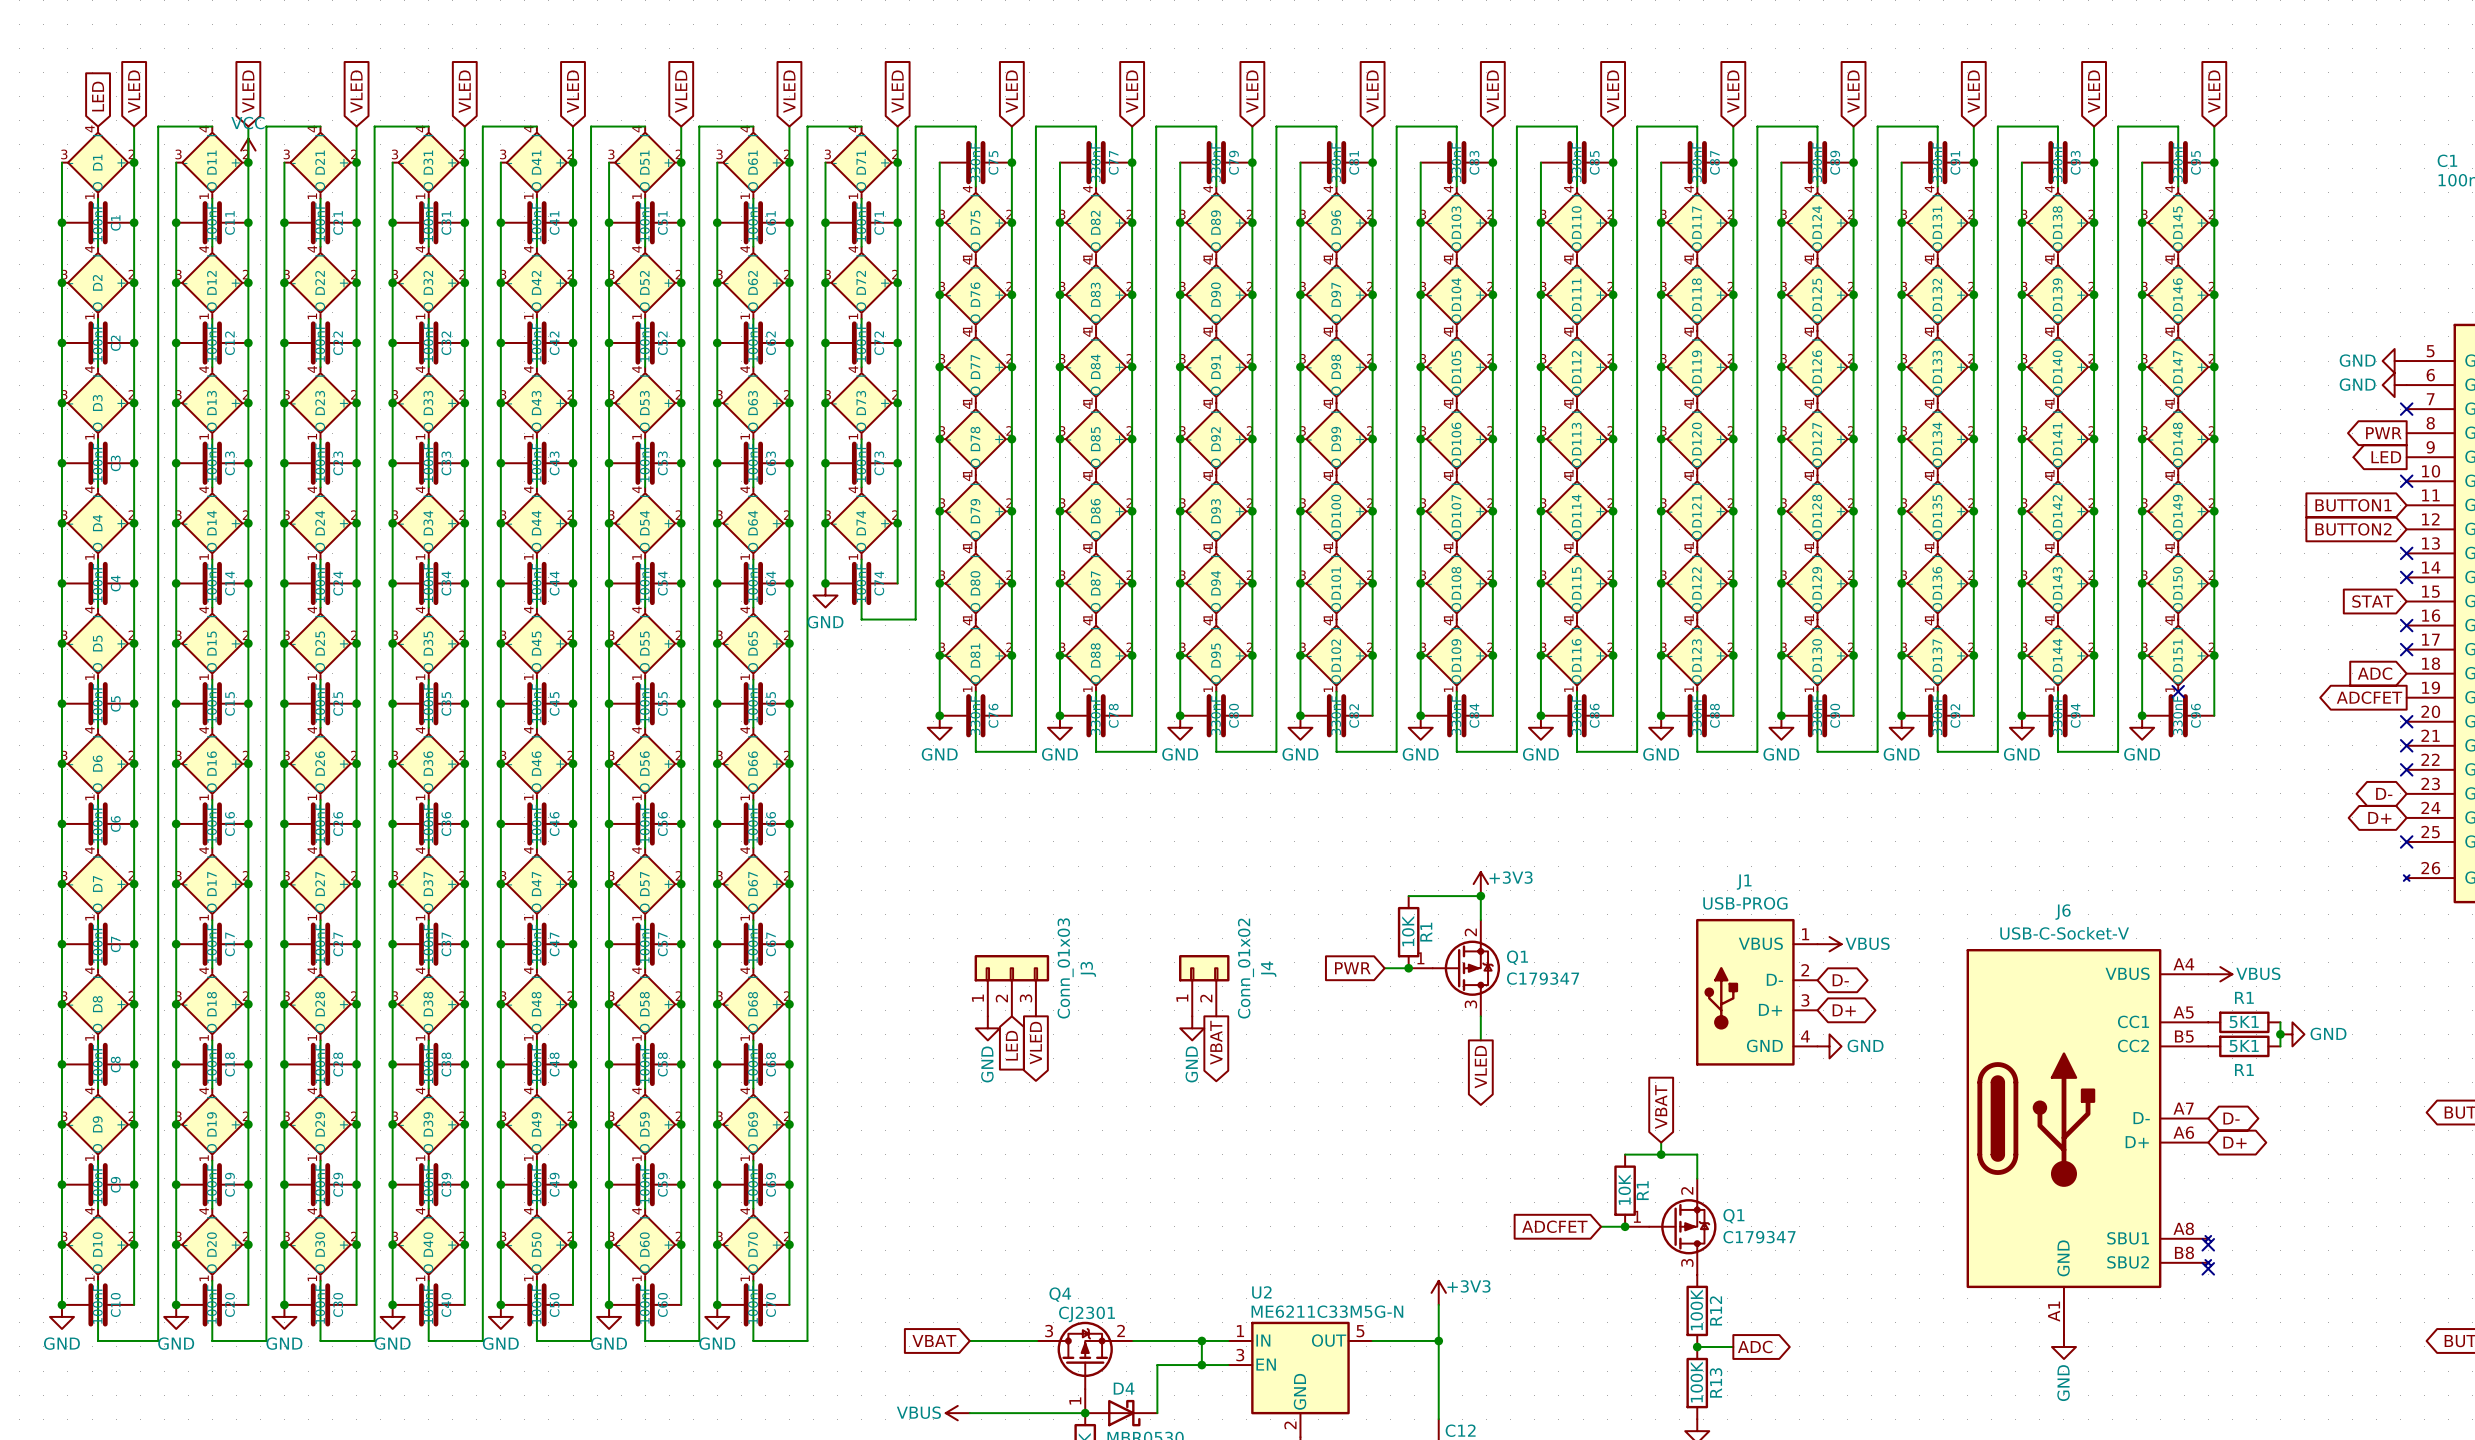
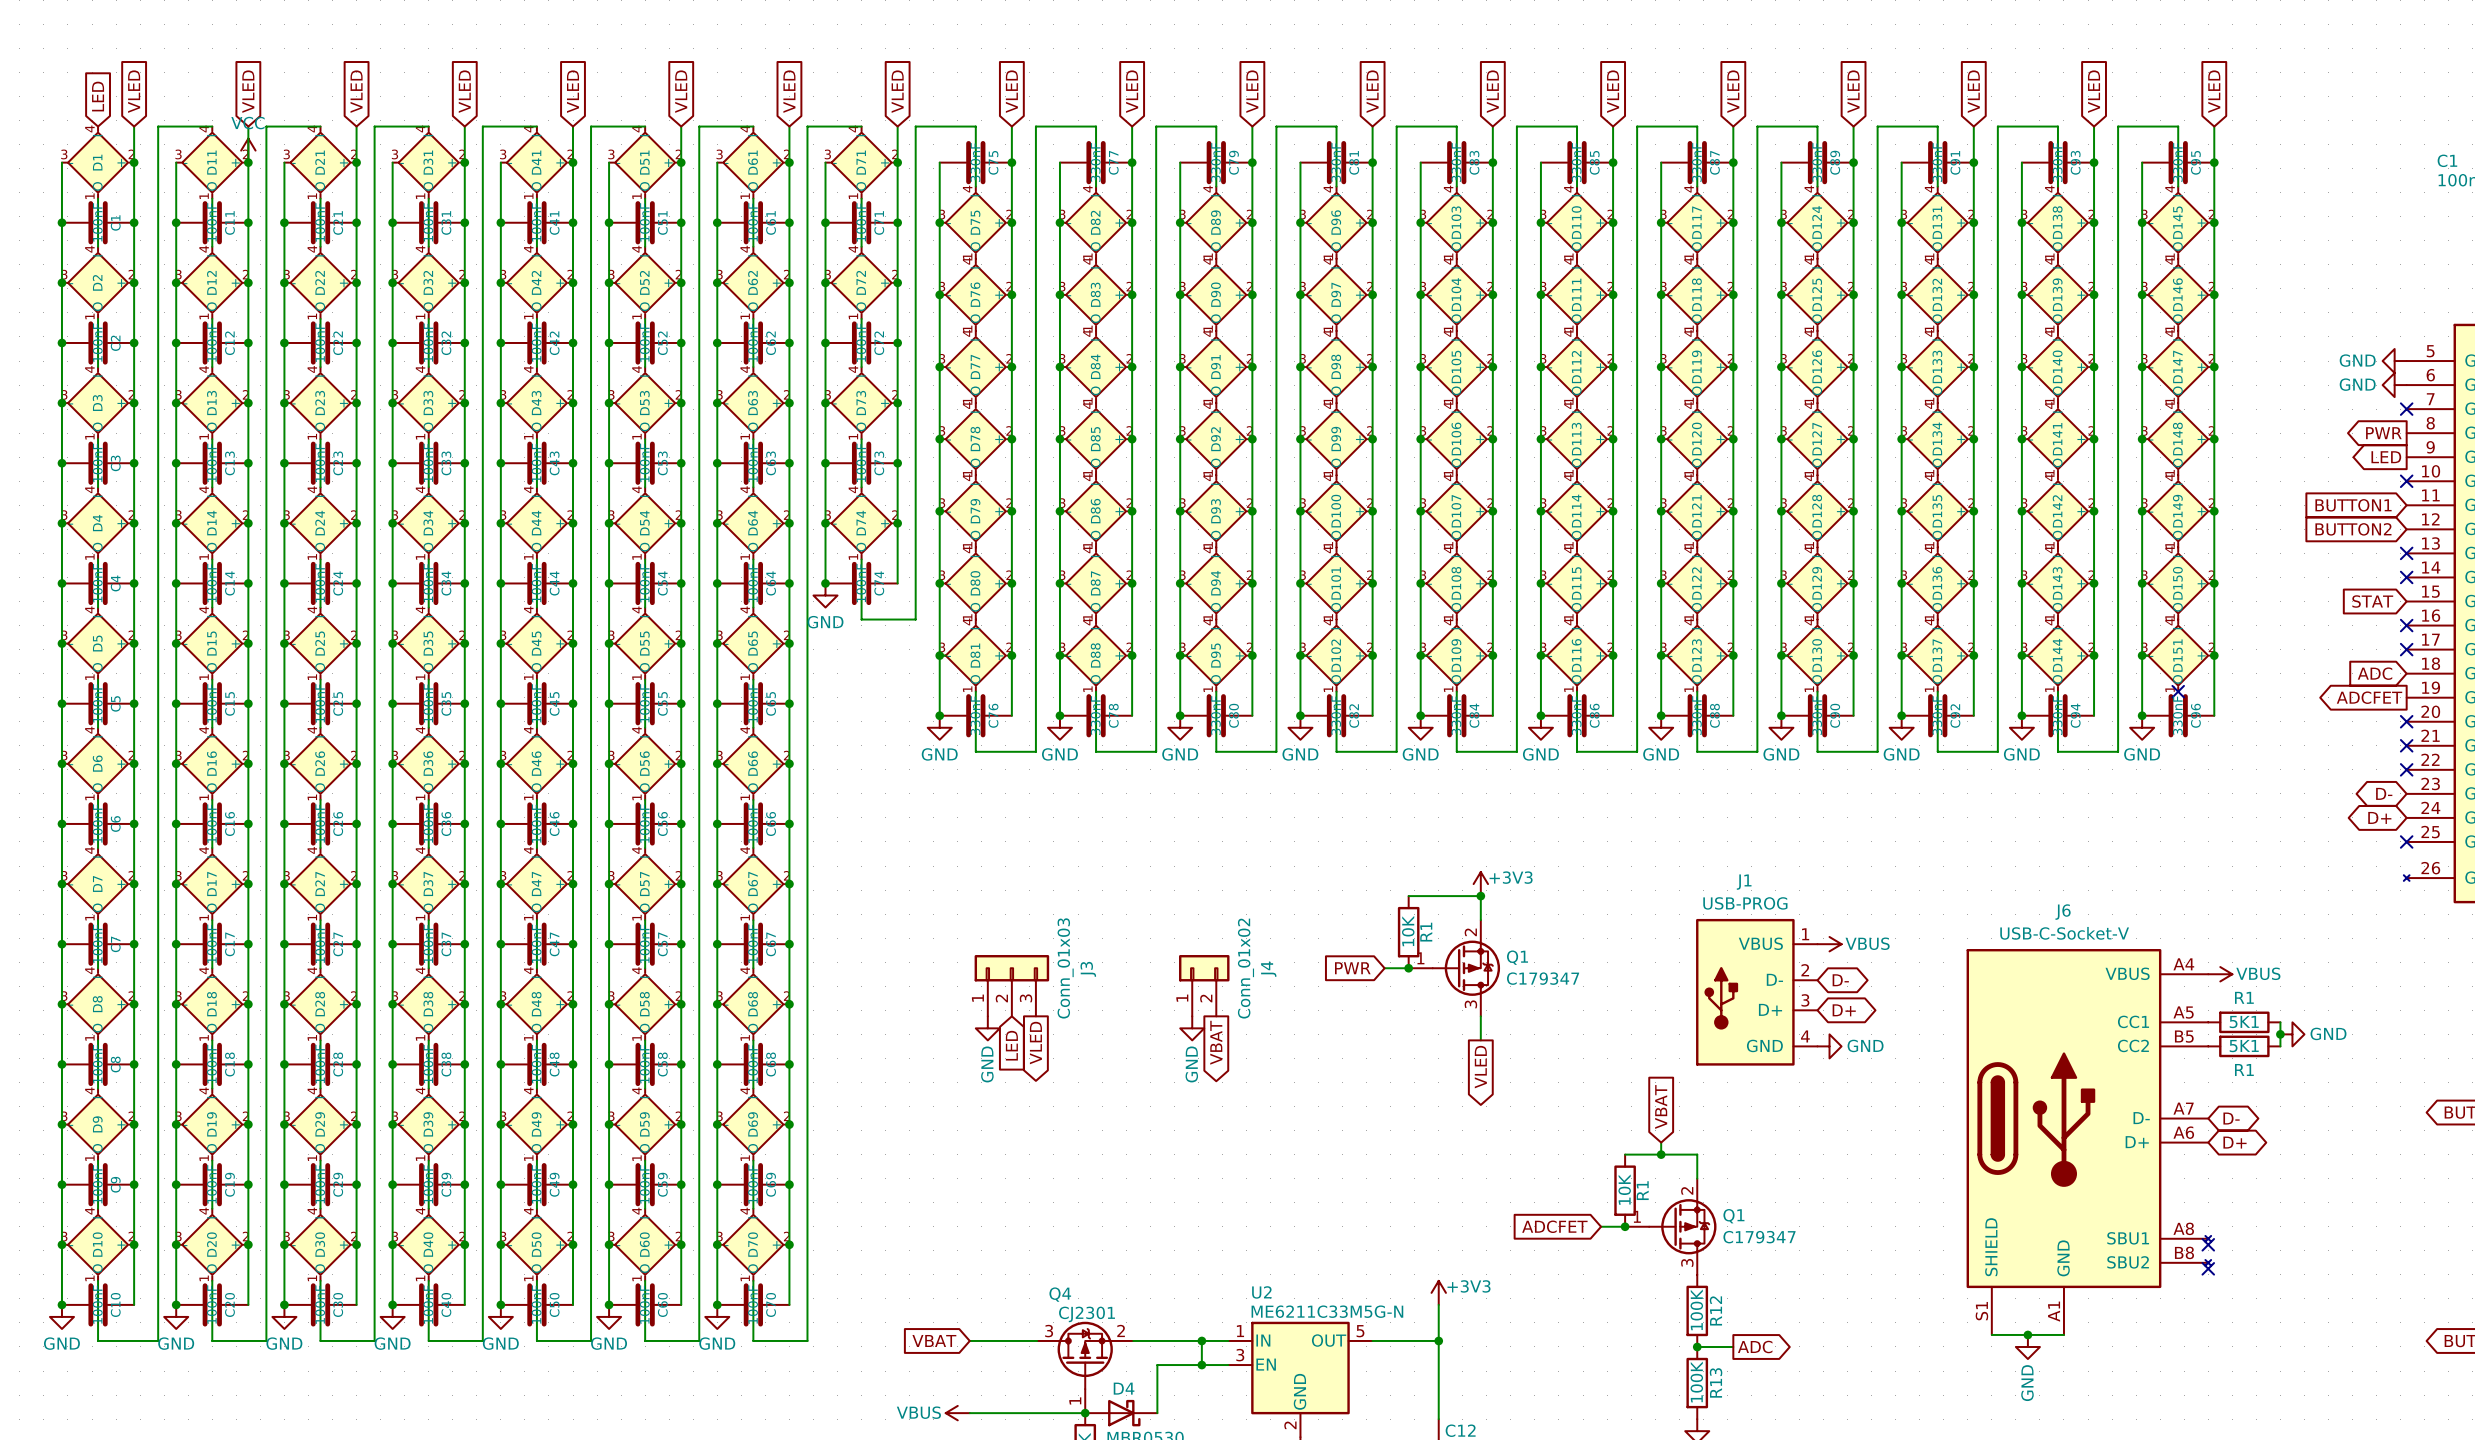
J6 symbol: [1966, 949, 2212, 1335] -> [1966, 949, 2212, 1335]
wire: none -> (1991, 1334) (2063, 1334)
junction: none -> (2027, 1334)
power symbol position: GND (2063, 1346) -> GND (2027, 1346)

